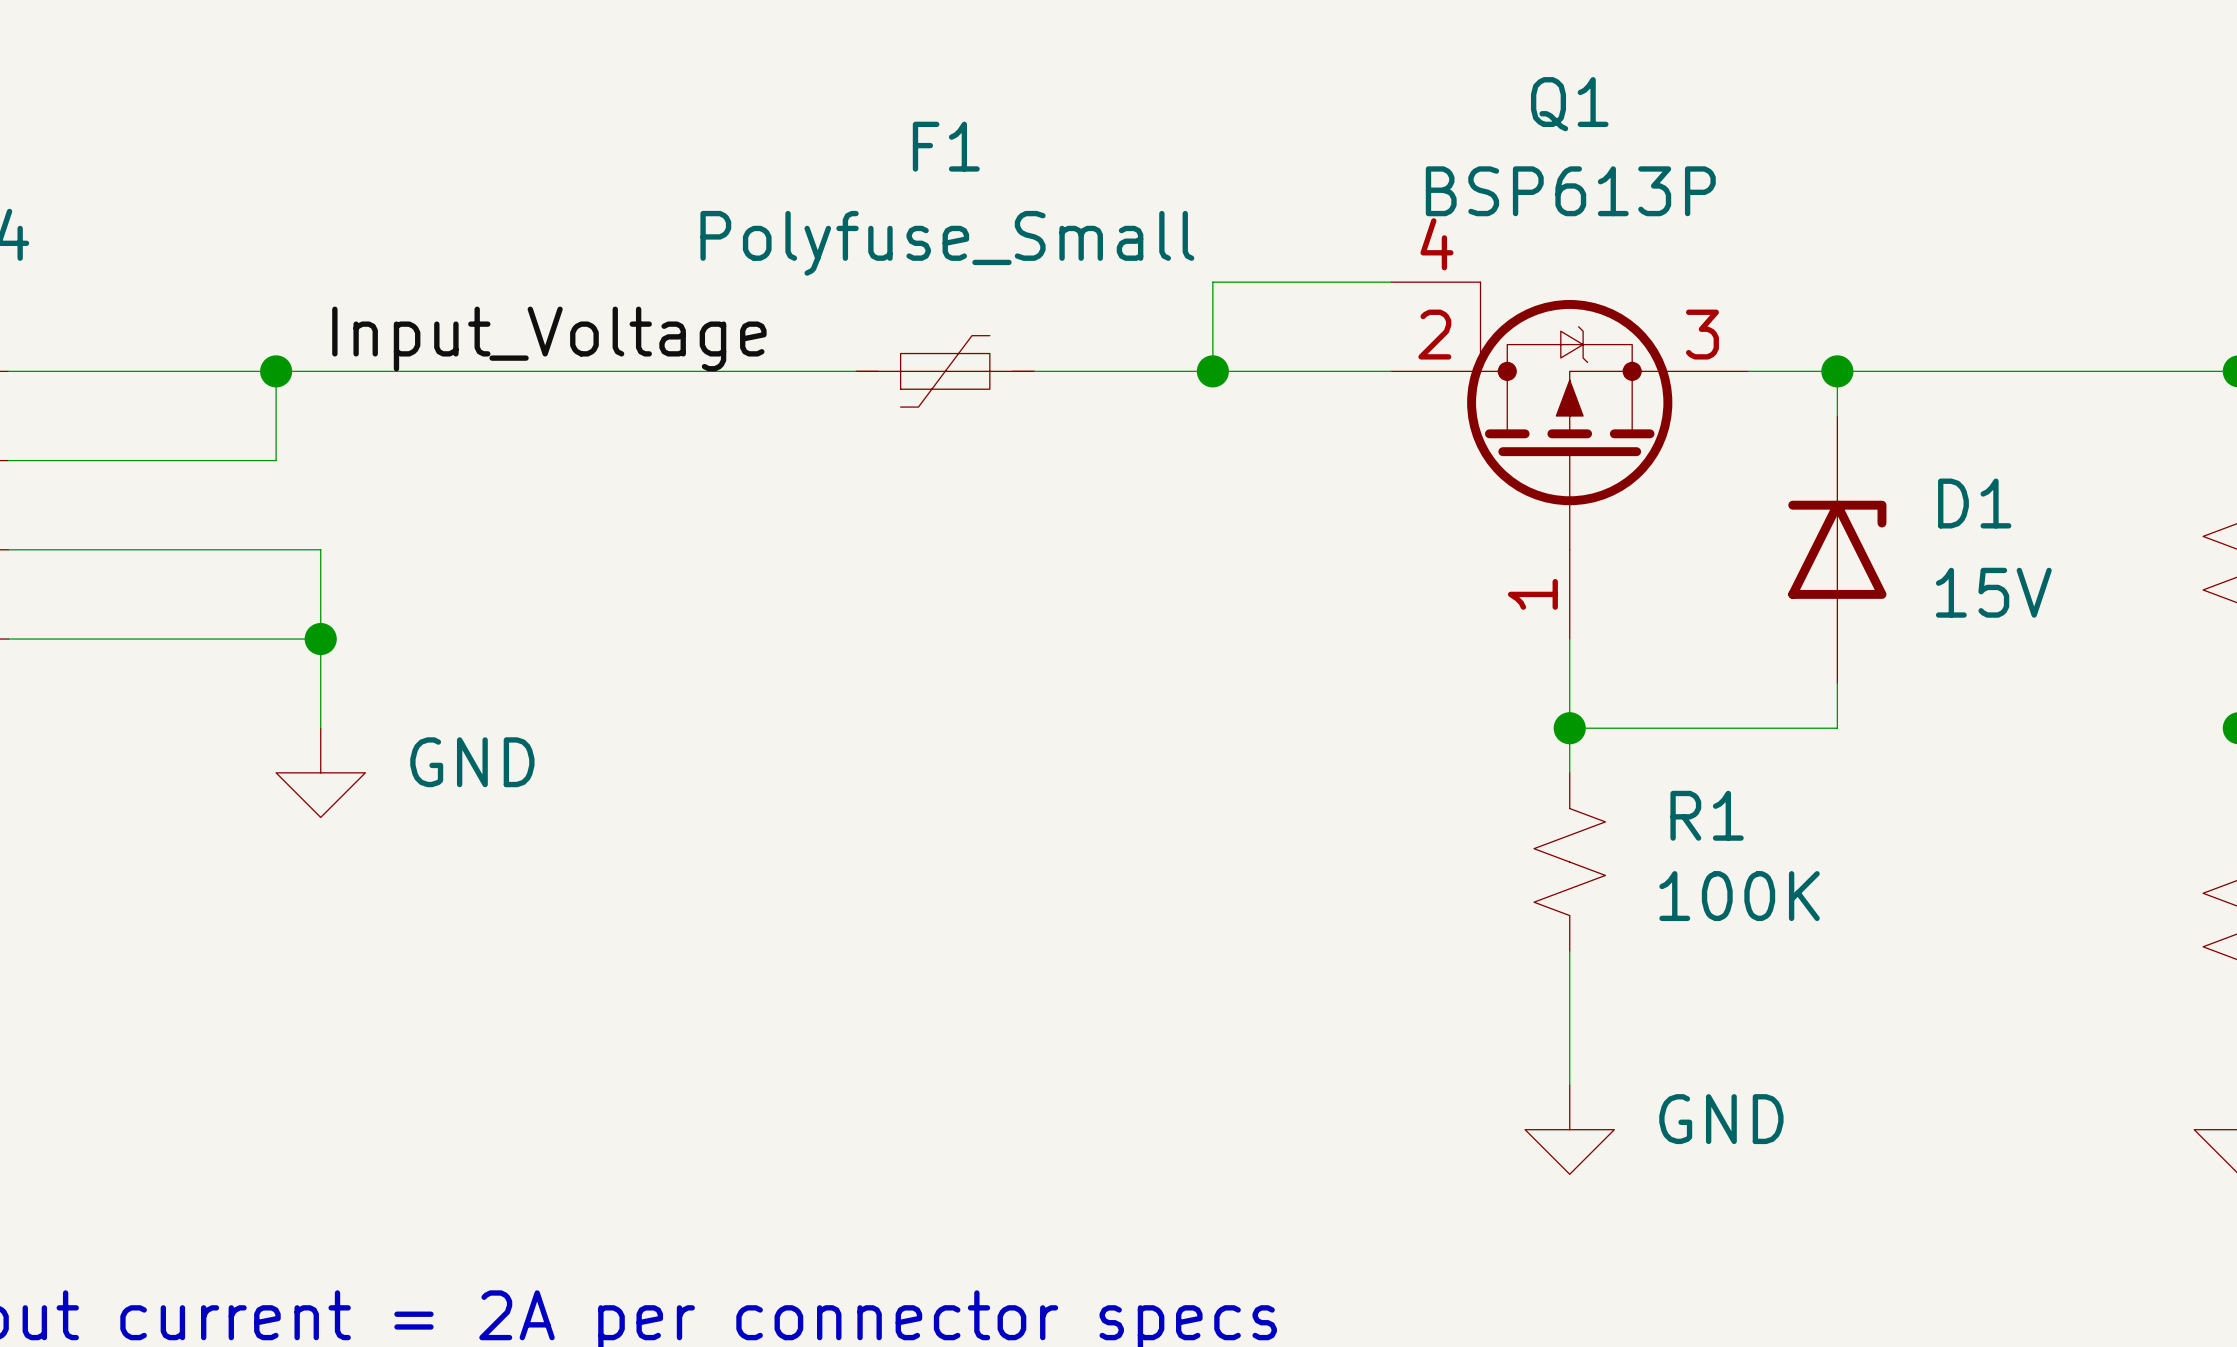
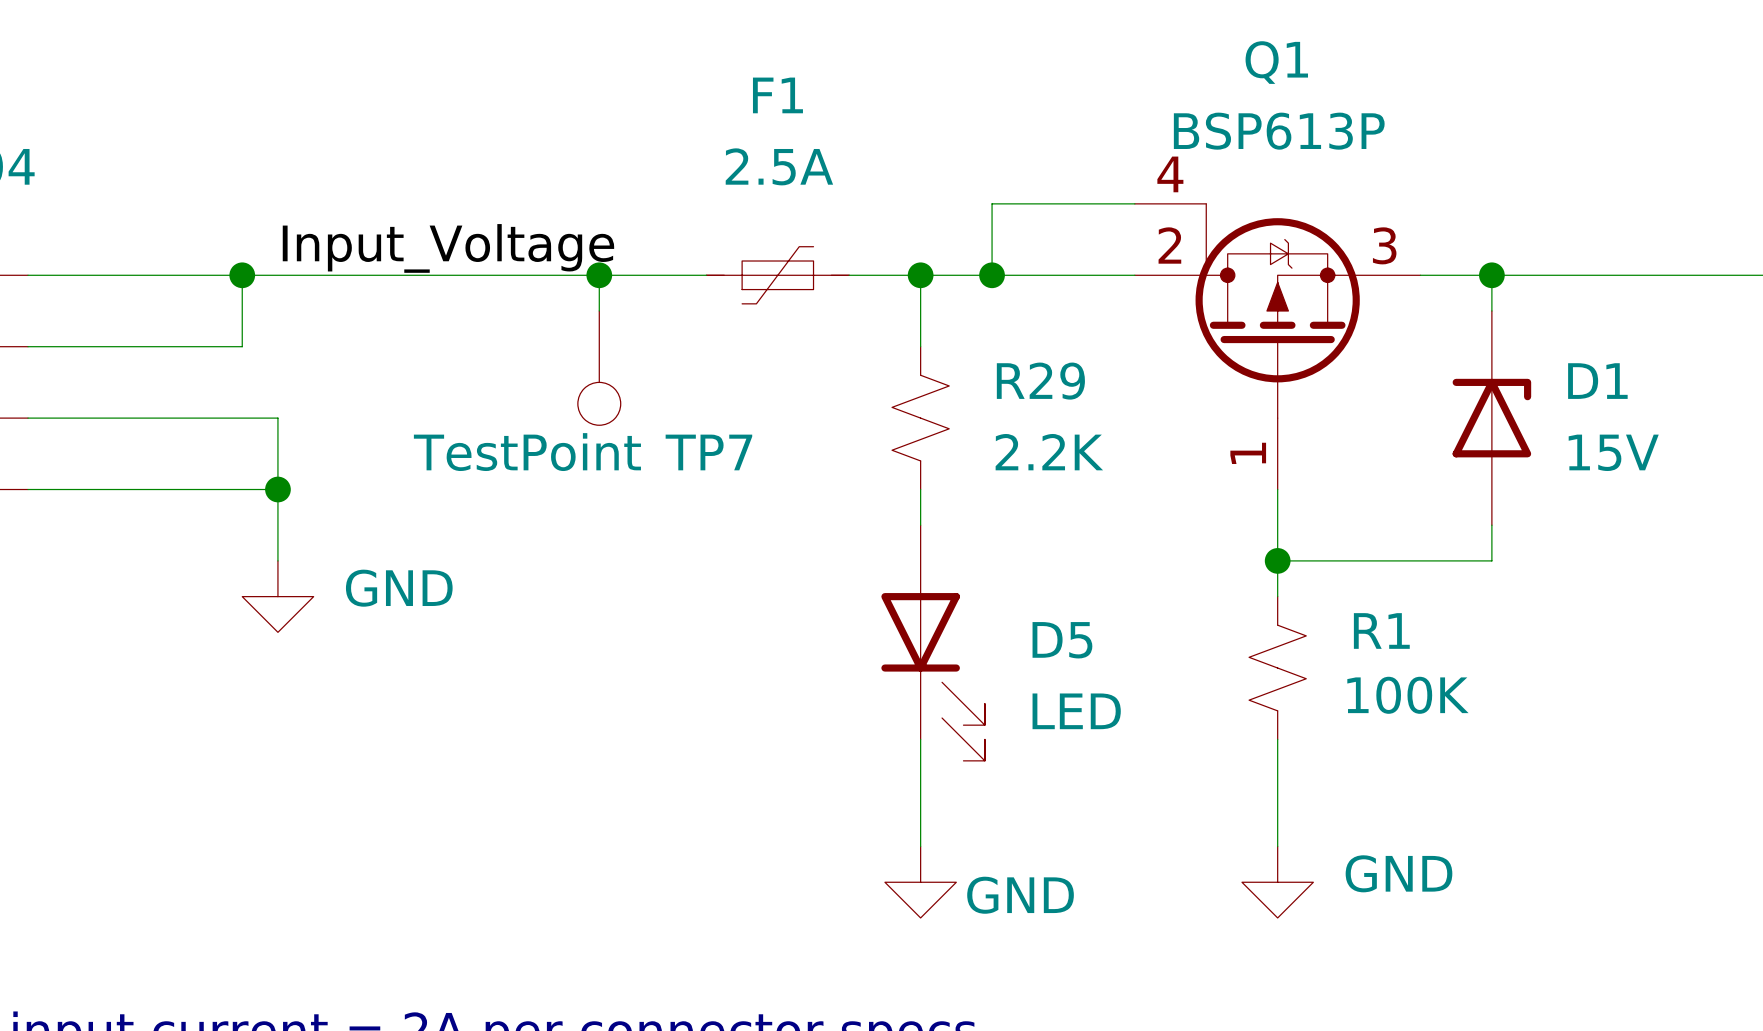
F1 value: Polyfuse_Small (947, 243) -> 2.5A (779, 166)
wire: none -> (599, 275) (599, 310)
junction: none -> (599, 275)
wire: none -> (920, 275) (920, 346)
junction: none -> (920, 275)
TP7: none -> TestPoint (599, 368)
R29: none -> 2.2K (920, 418)
wire: none -> (920, 489) (920, 525)
D5: none -> LED (933, 643)
wire: none -> (920, 739) (920, 846)
power symbol: none -> GND (920, 882)

